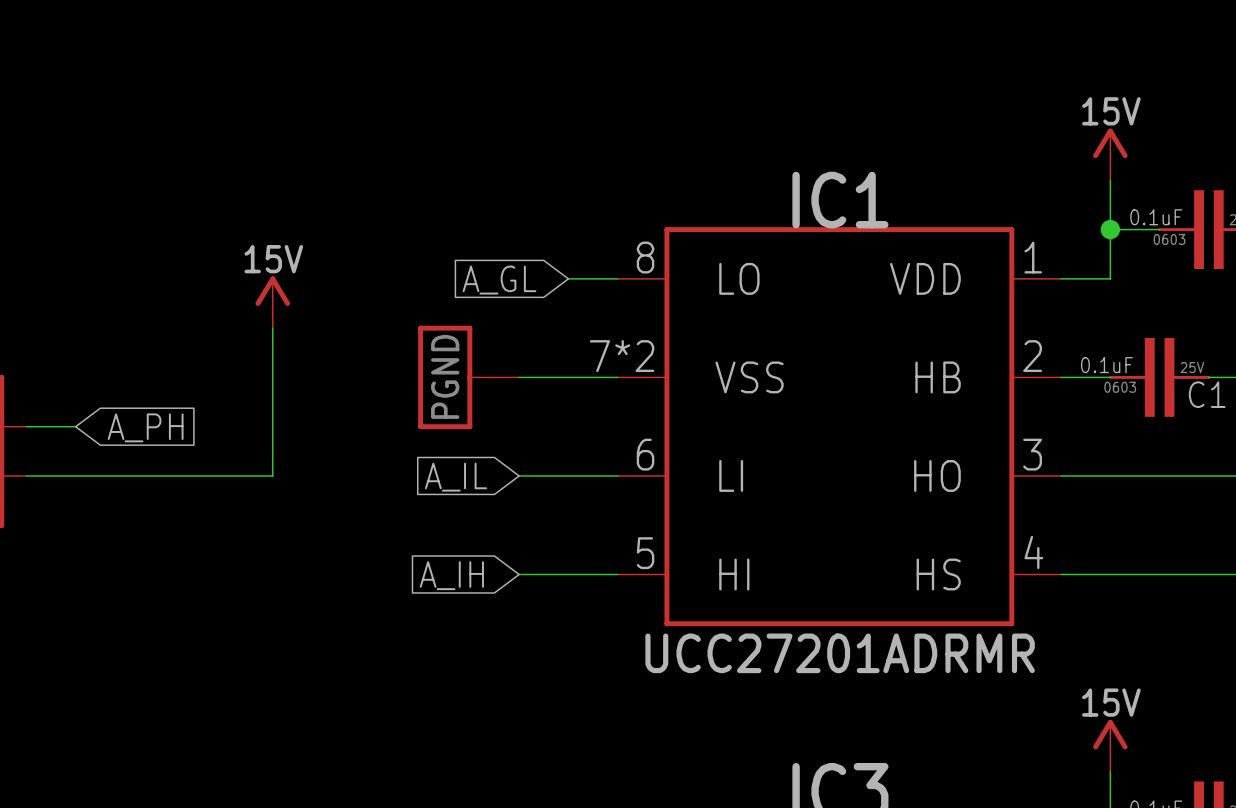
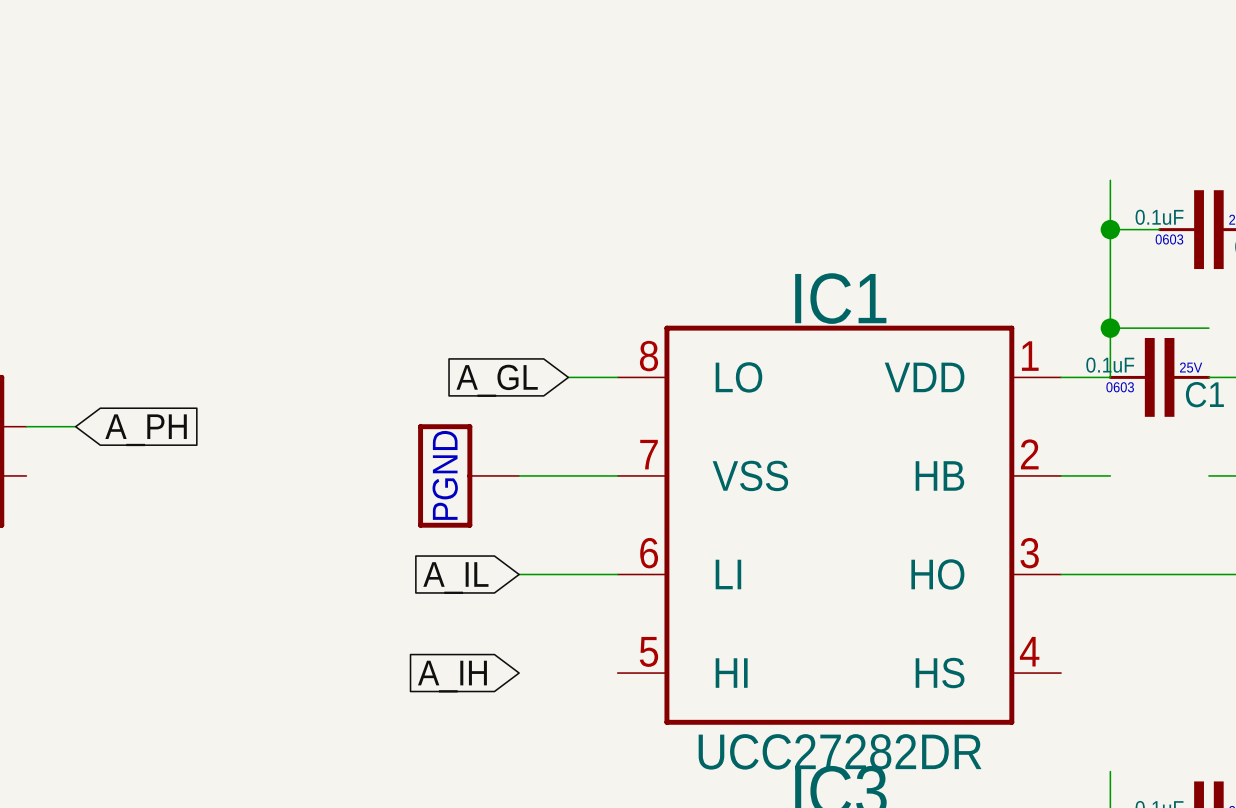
power symbol: 15V (1110, 154) -> none
wire: (568, 278) (617, 278) -> none
wire: (1061, 278) (1110, 278) -> (1110, 377) (1110, 278)
global label position: A_GL (499, 280) -> A_GL (497, 380)
power symbol: 15V (272, 302) -> none
wire: (272, 328) (272, 475) (26, 475) -> none
junction: none -> (1110, 328)
IC1 pin number: 7*2 (622, 356) -> 7 (649, 454)
power symbol position: PGND (468, 377) -> PGND (468, 475)
wire: (519, 377) (568, 377) -> none
IC1 position: (839, 426) -> (839, 525)
wire: (1110, 475) (1208, 475) -> (1110, 328) (1208, 328)
global label: A_IL (456, 477) -> none
global label: A_IH (451, 575) -> A_IL (455, 578)
IC1 text: UCC27201ADRMR (840, 653) -> UCC27282DR (840, 751)
global label: none -> A_IH (452, 676)
power symbol: 15V (1110, 745) -> none

